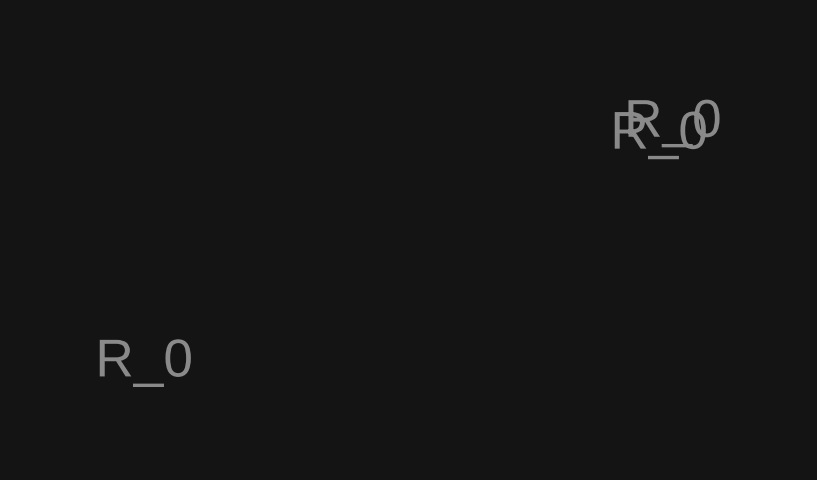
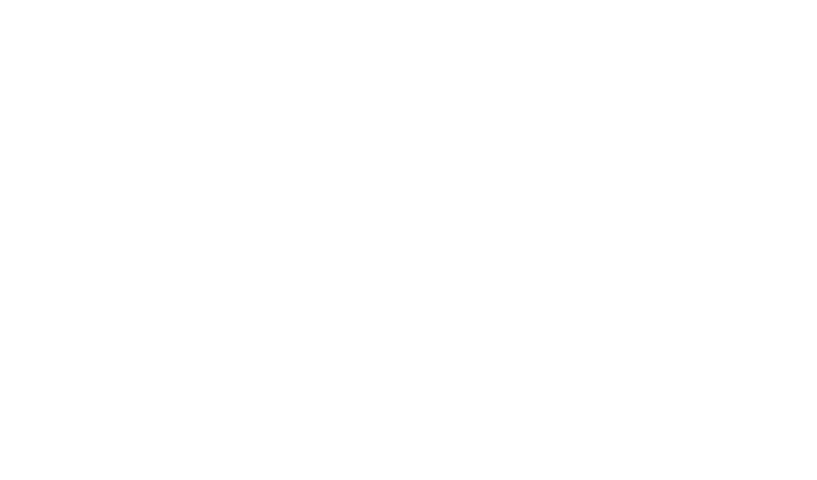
drawing: [614, 99, 720, 160] -> none
drawing: [99, 339, 191, 387] -> none

